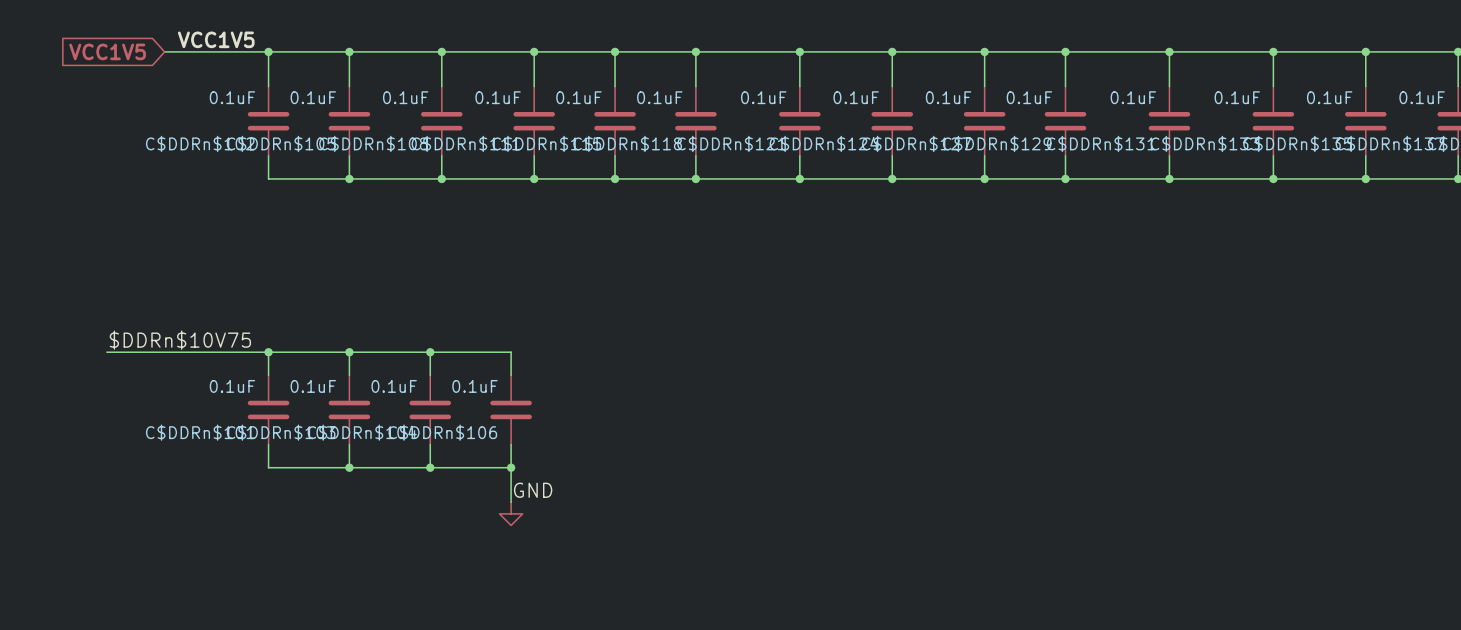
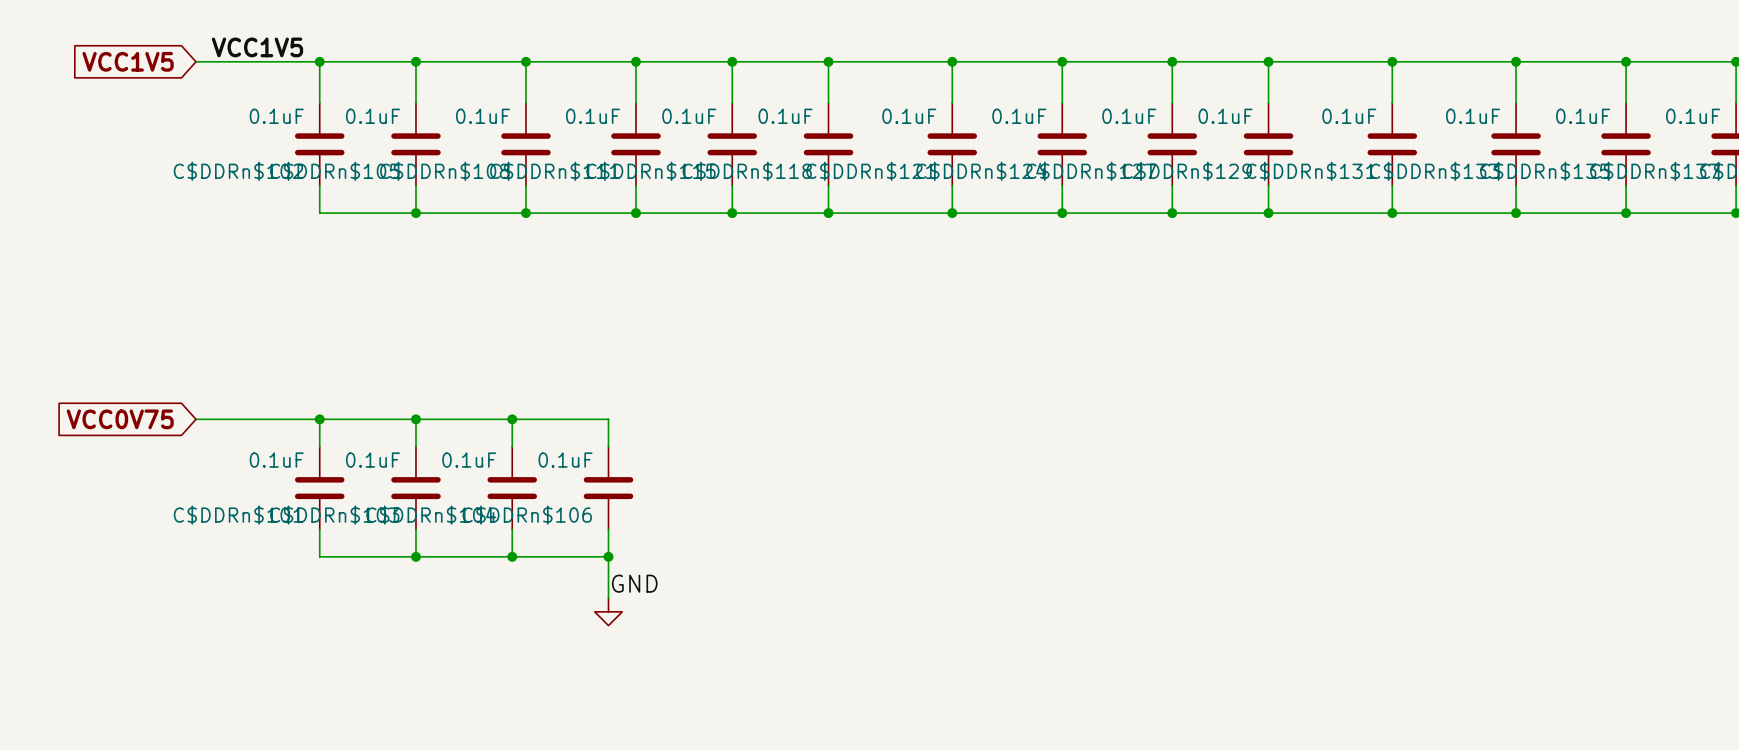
label: $DDRn$10V75 (180, 340) -> none
global label: none -> VCC0V75 (120, 419)
wire: (106, 352) (164, 352) -> none

